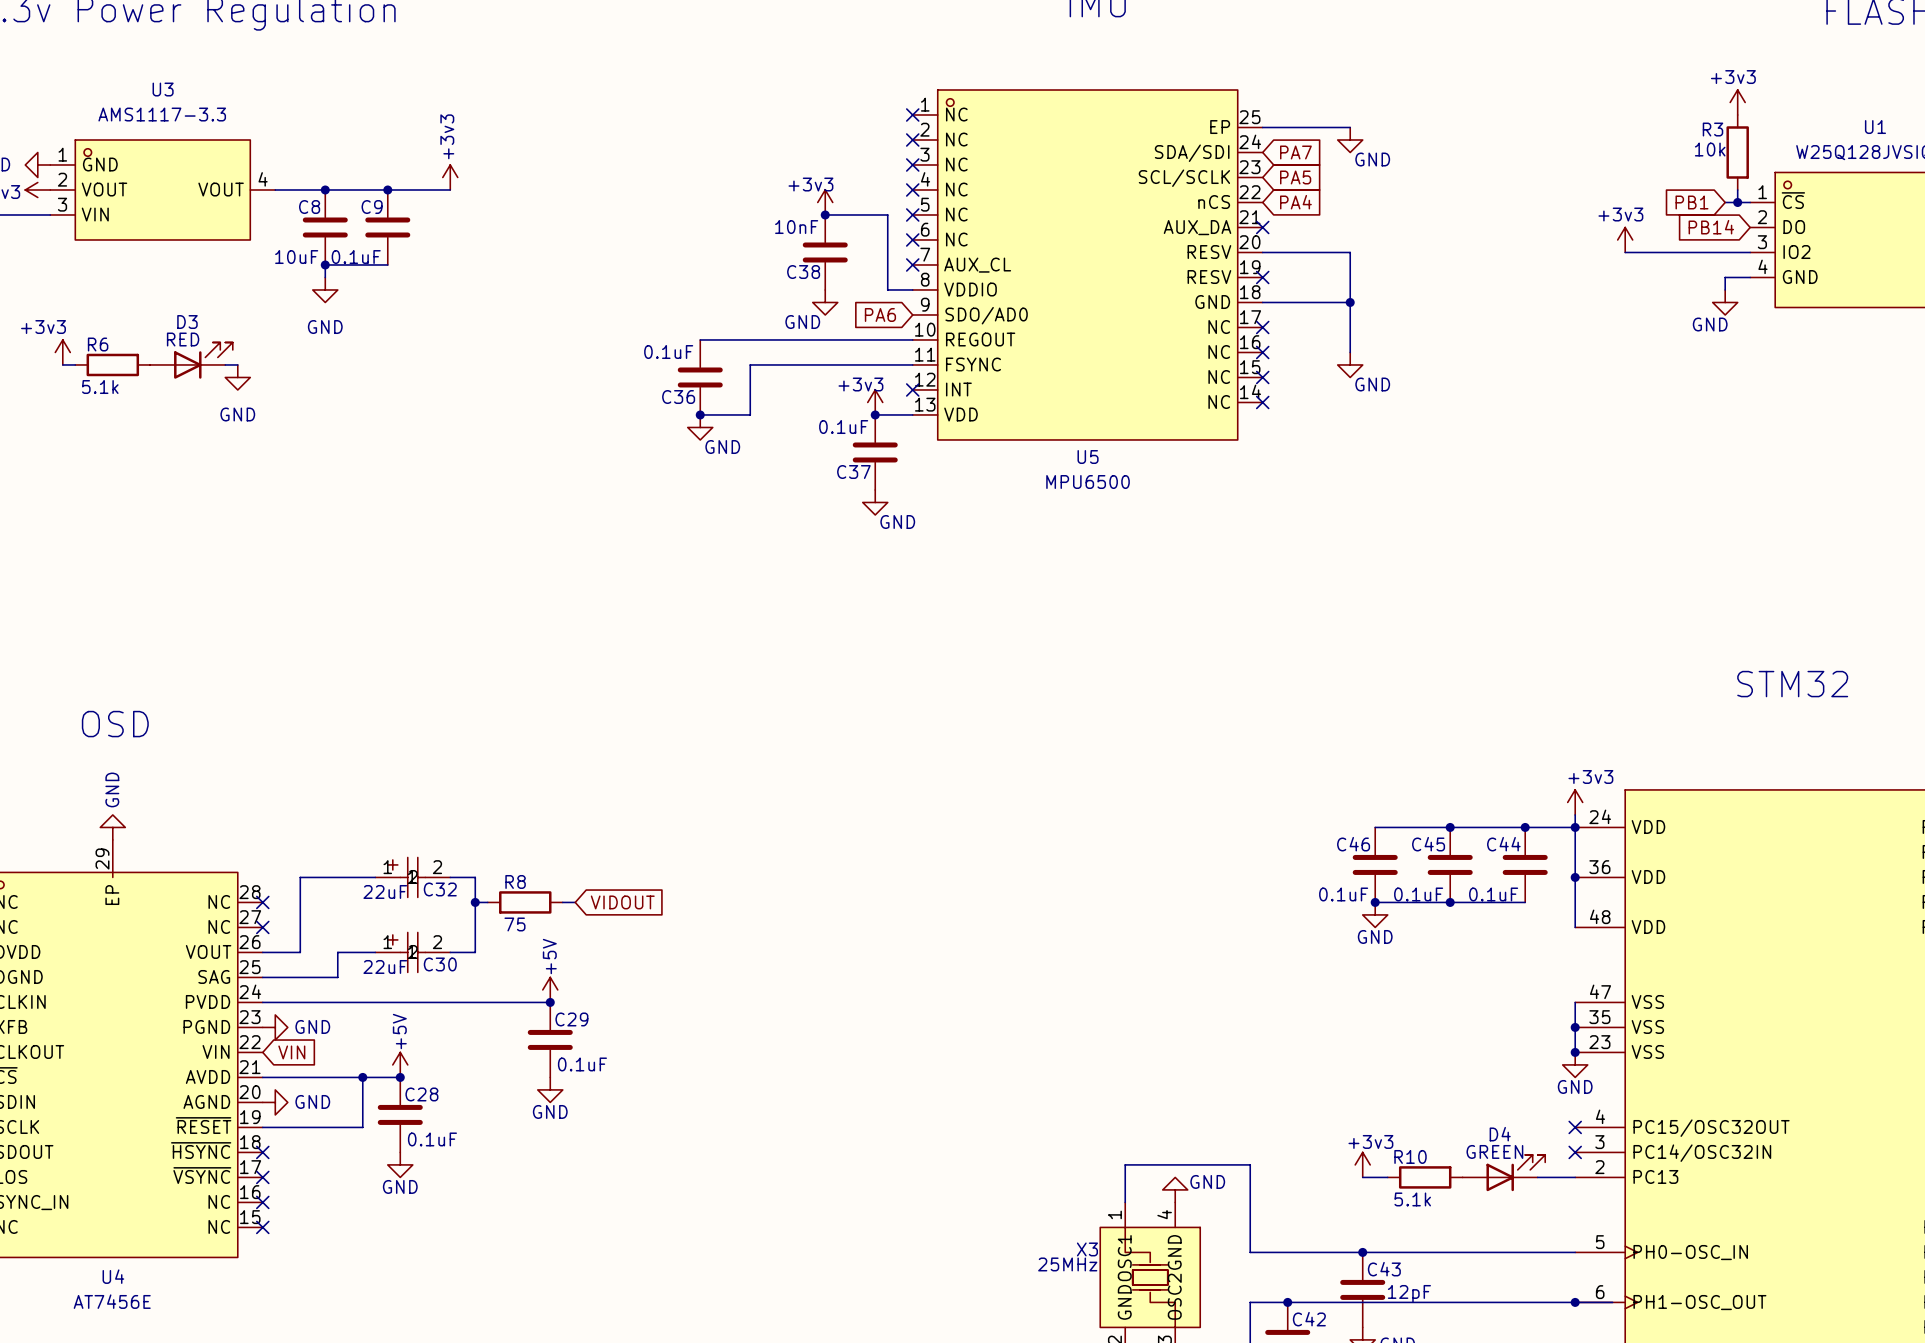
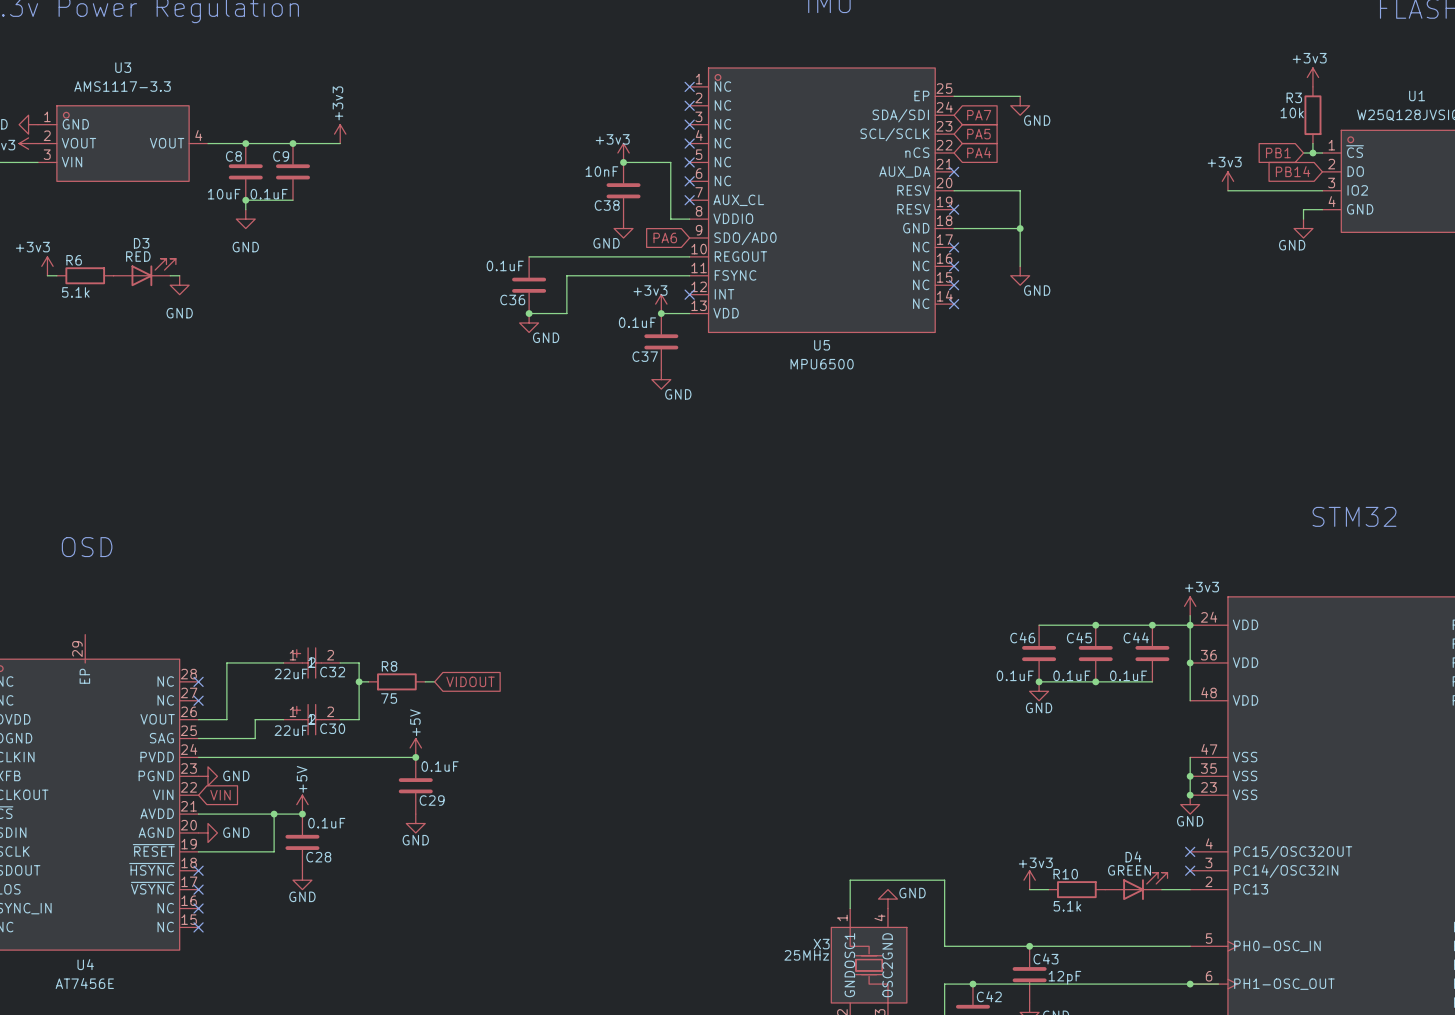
power symbol: GND (112, 827) -> none
C29 name position: C29 (571, 1019) -> C29 (432, 800)
C29 value position: 0.1uF (582, 1064) -> 0.1uF (440, 766)
C28 name position: C28 (421, 1094) -> C28 (318, 857)
C28 value position: 0.1uF (432, 1139) -> 0.1uF (326, 823)

